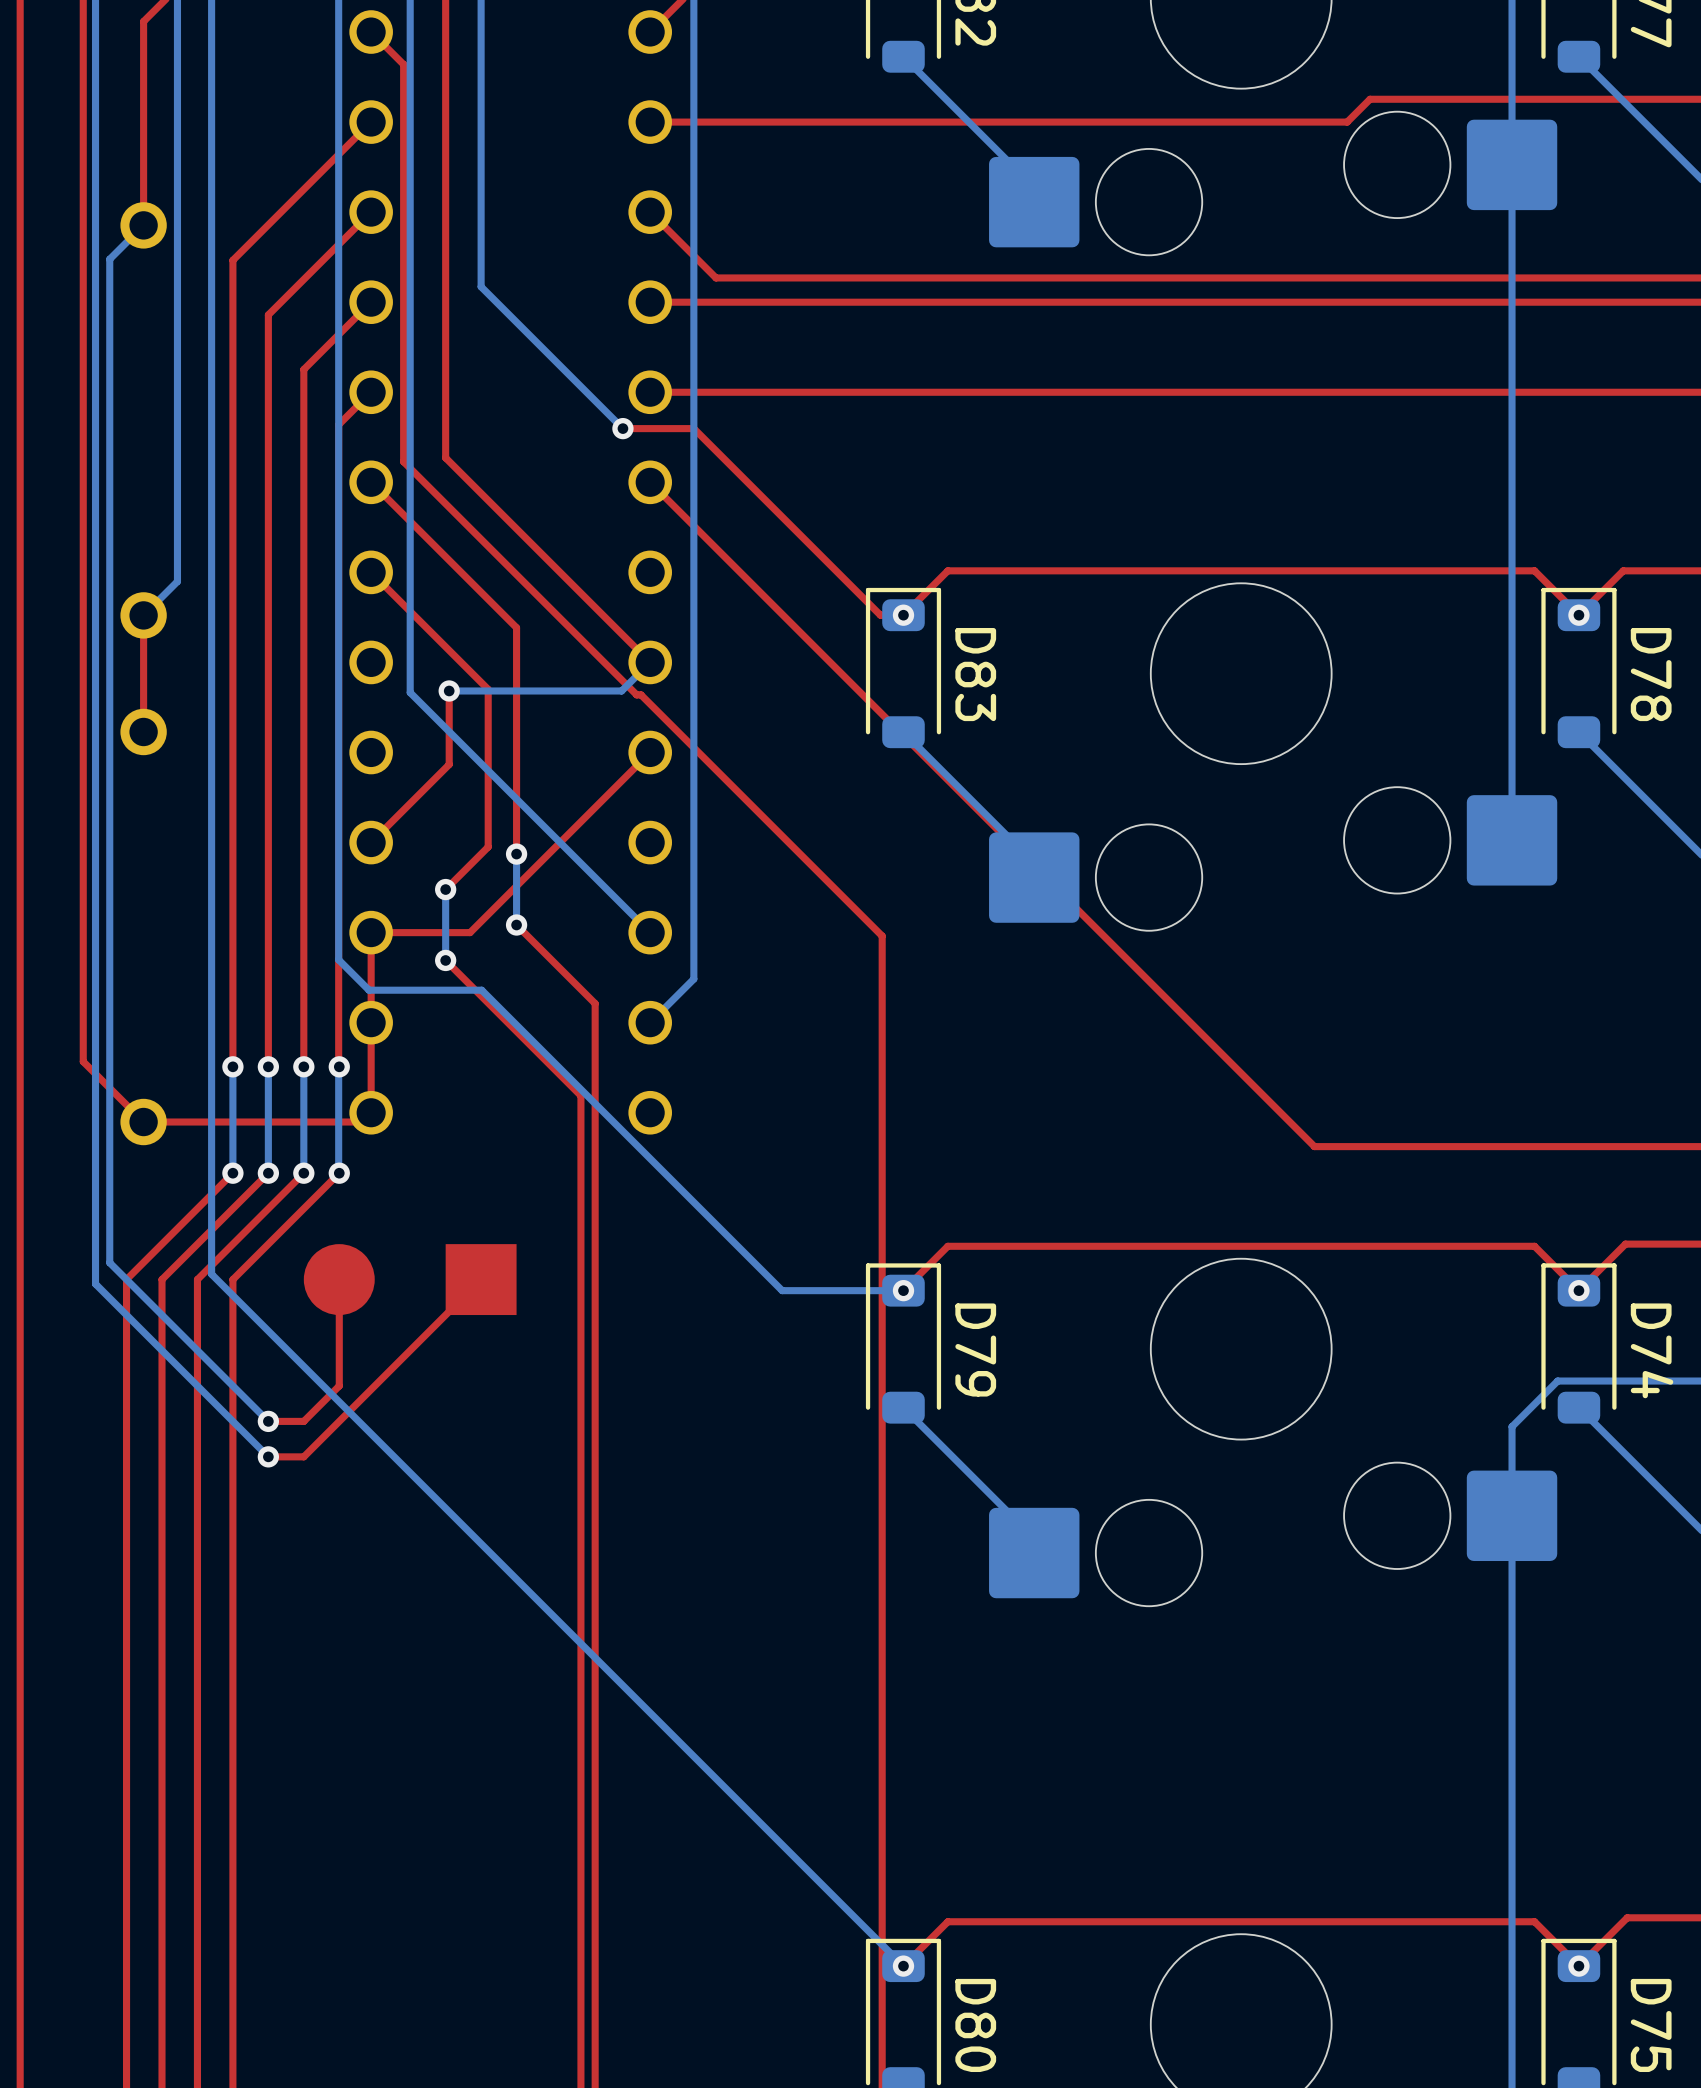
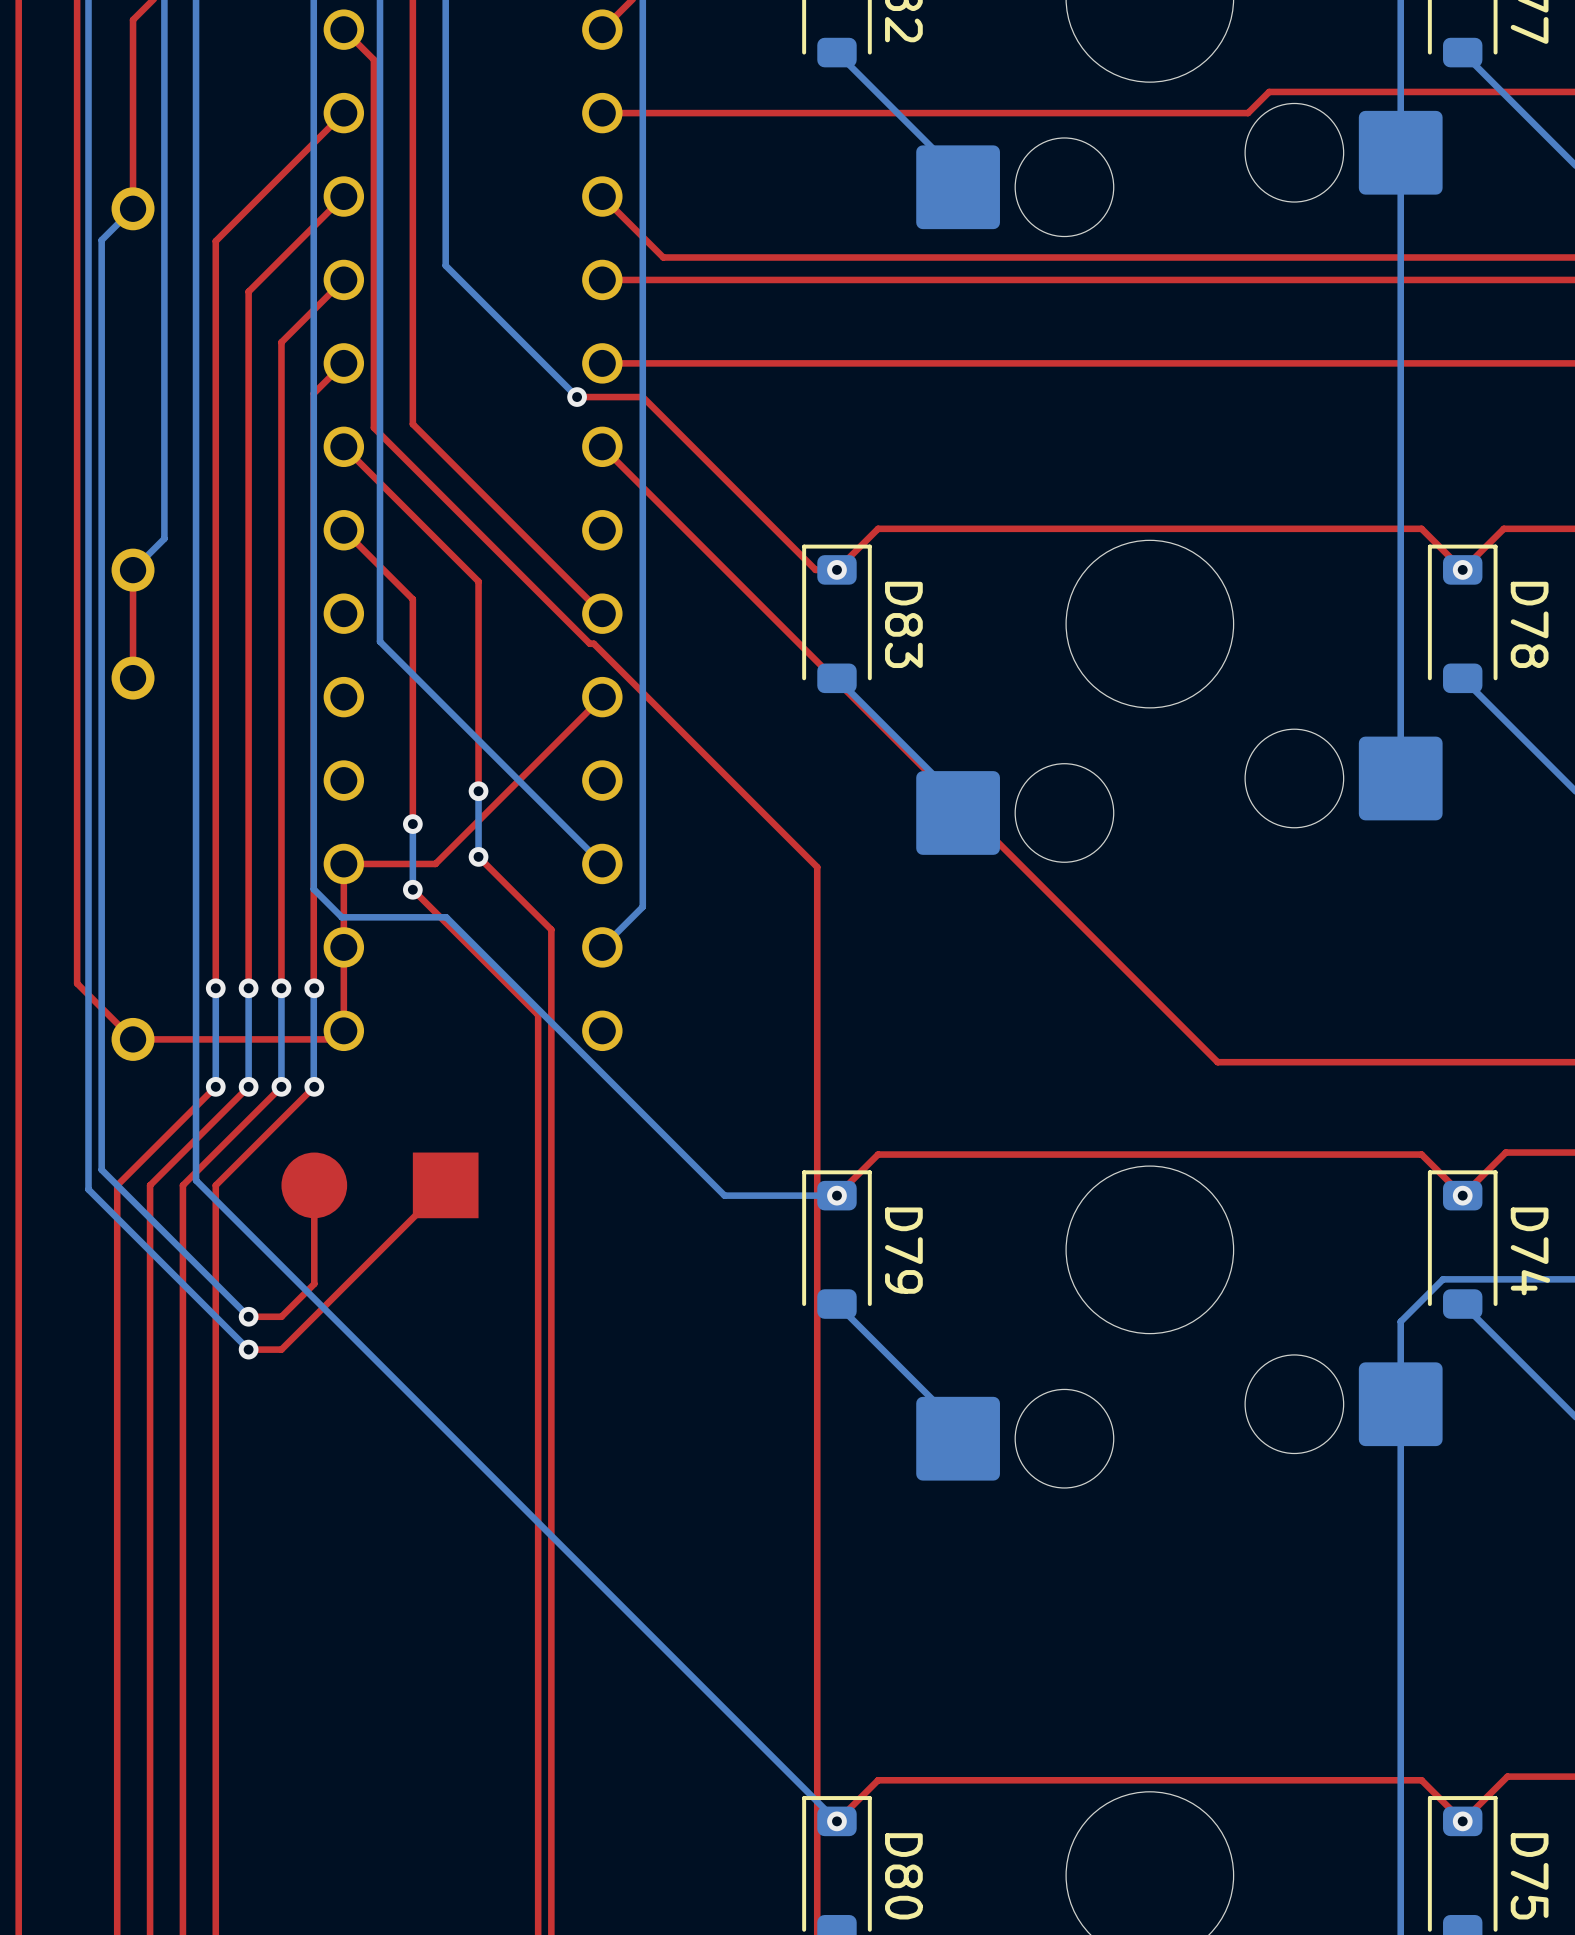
top track: (445, 646) (488, 689) (488, 847) (445, 889) -> (412, 599) (412, 824)
bottom track: (650, 662) (621, 690) (449, 690) -> none
top track: (449, 690) (449, 764) (371, 842) -> none
via: (449, 690) -> none

